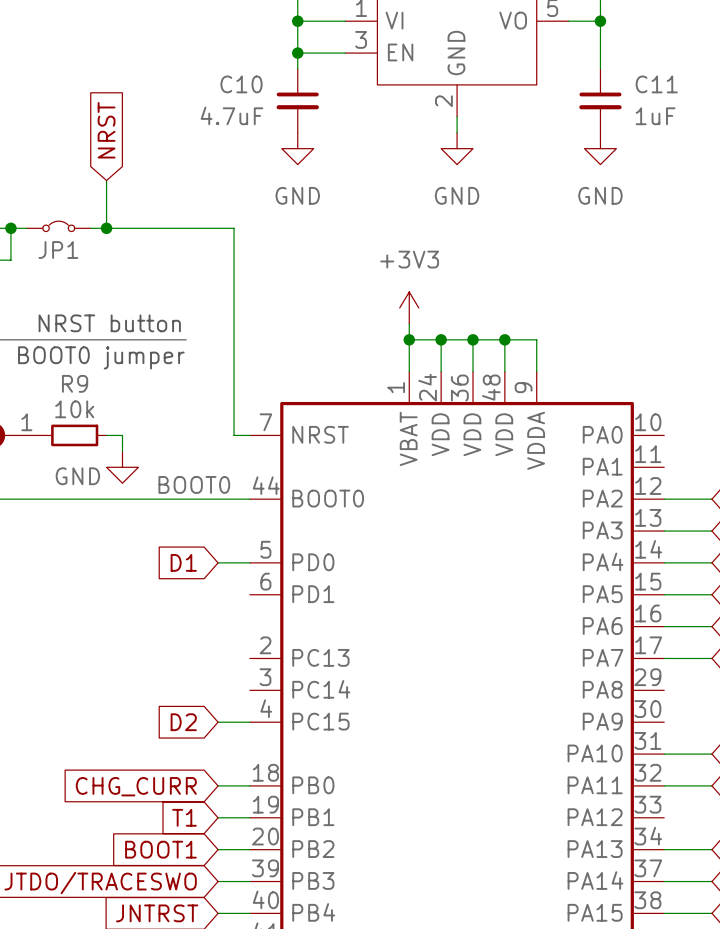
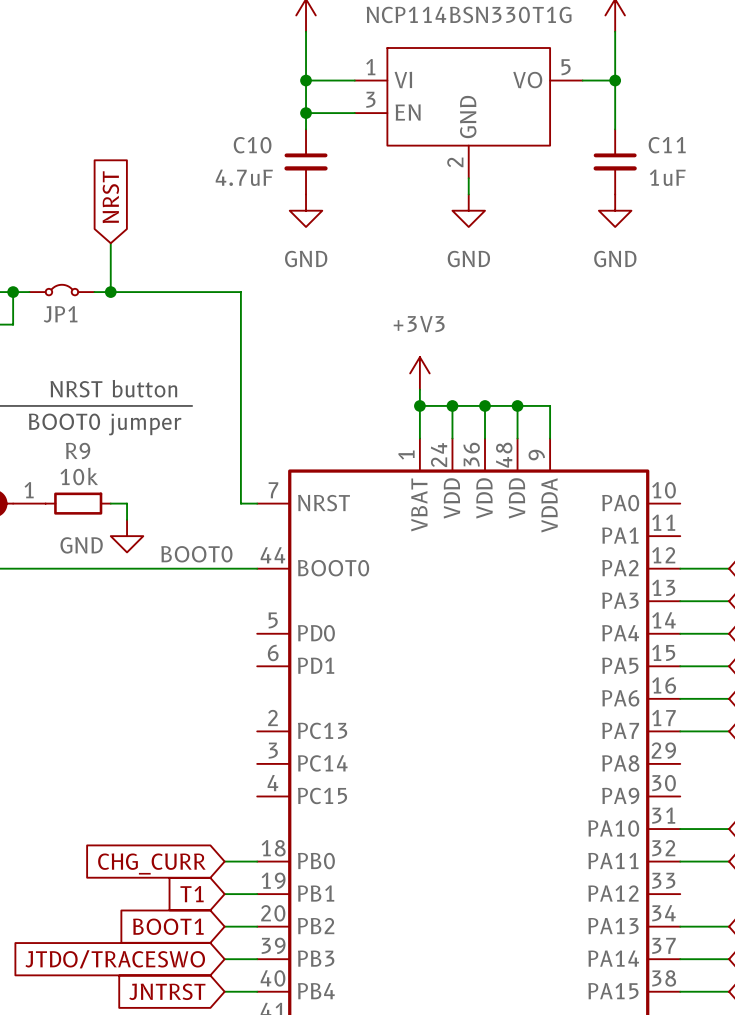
global label: D1 (183, 562) -> none
wire: (218, 562) (249, 562) -> none
global label: D2 (183, 722) -> none
wire: (218, 722) (249, 722) -> none

